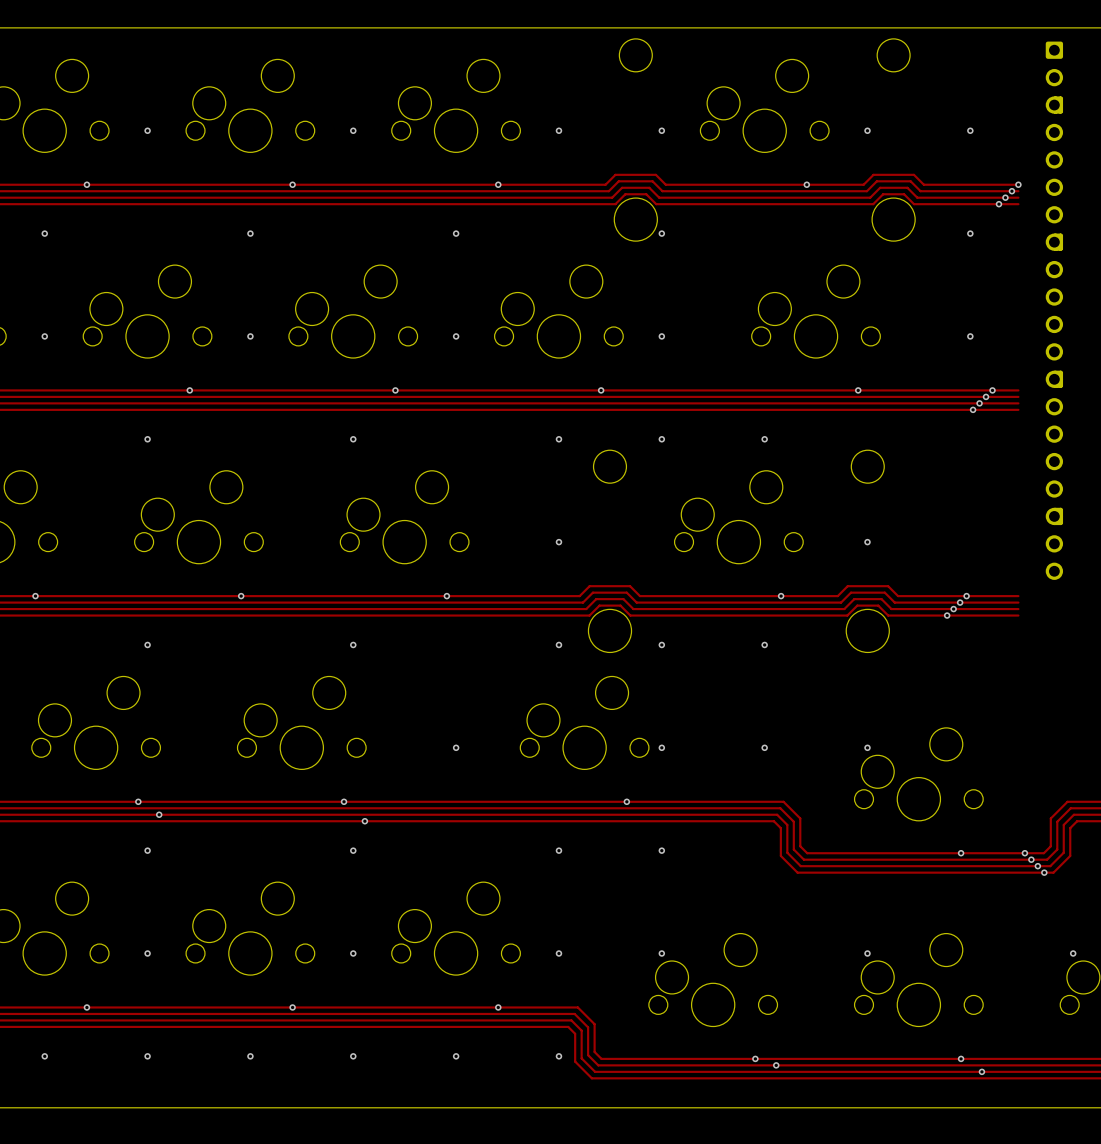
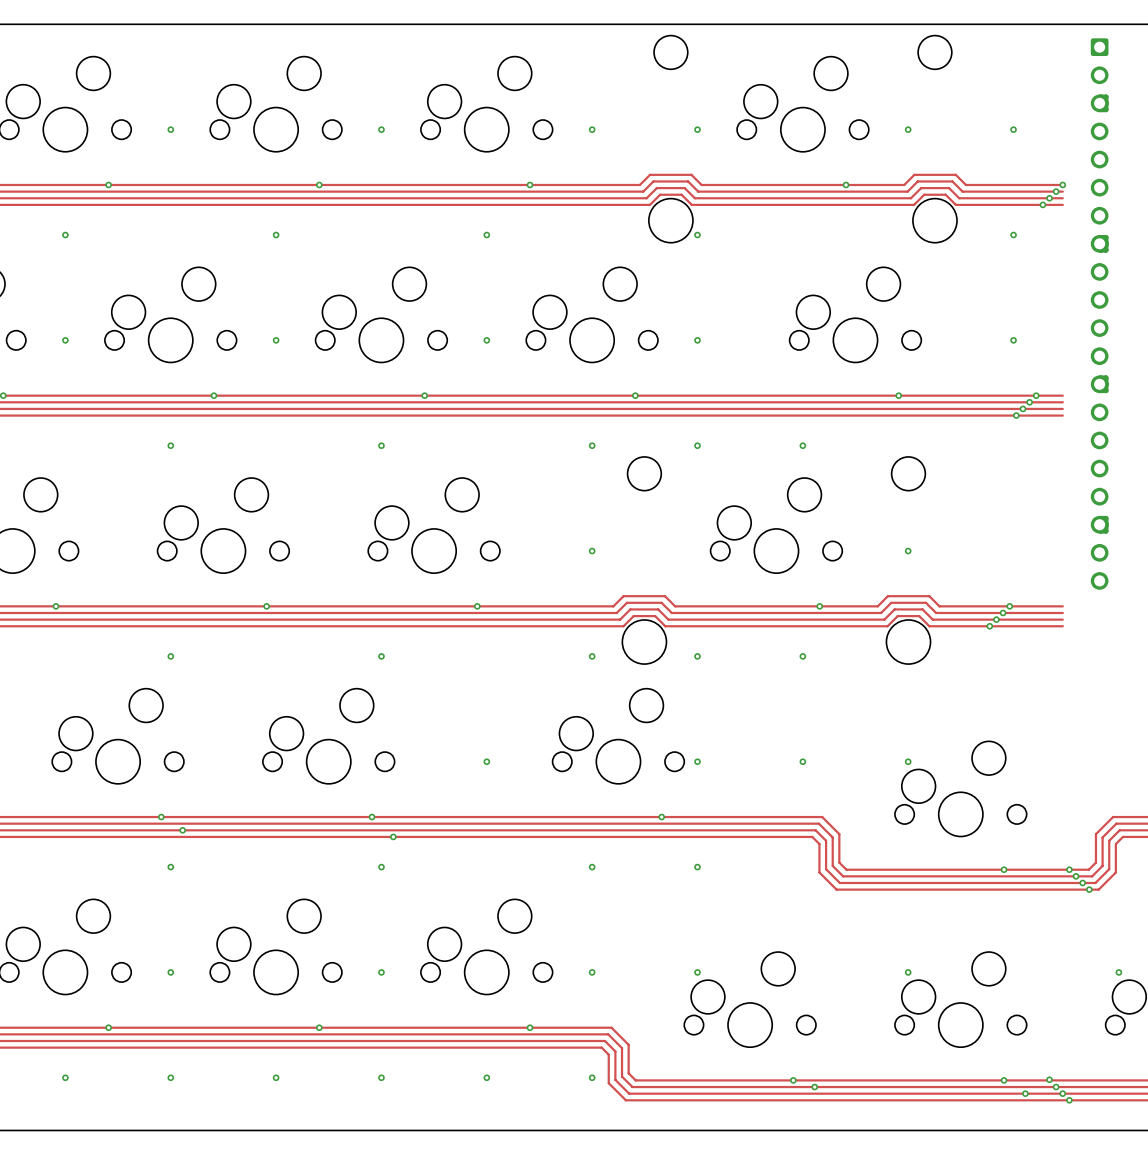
via: none -> (1049, 1079)
via: none -> (1056, 1087)
via: none -> (1062, 1093)
via: none -> (1069, 1100)

